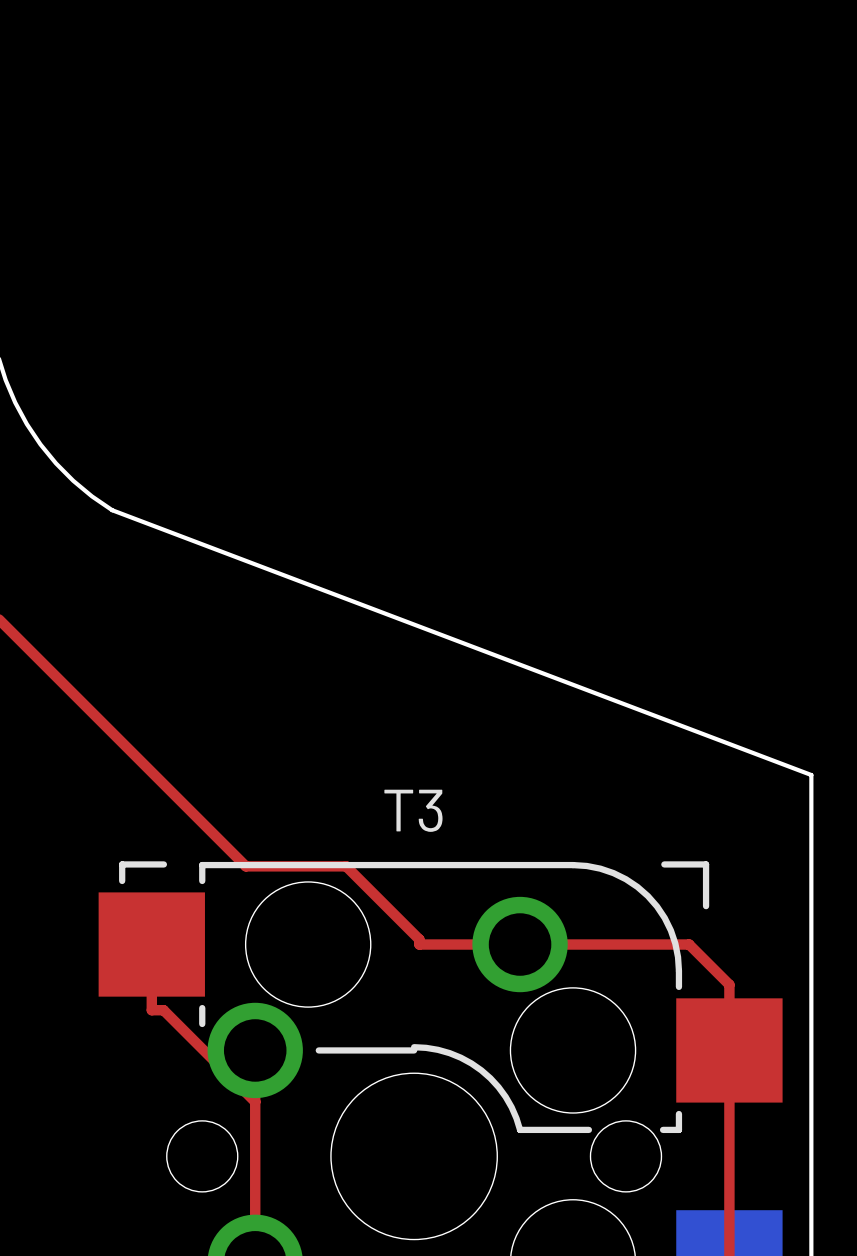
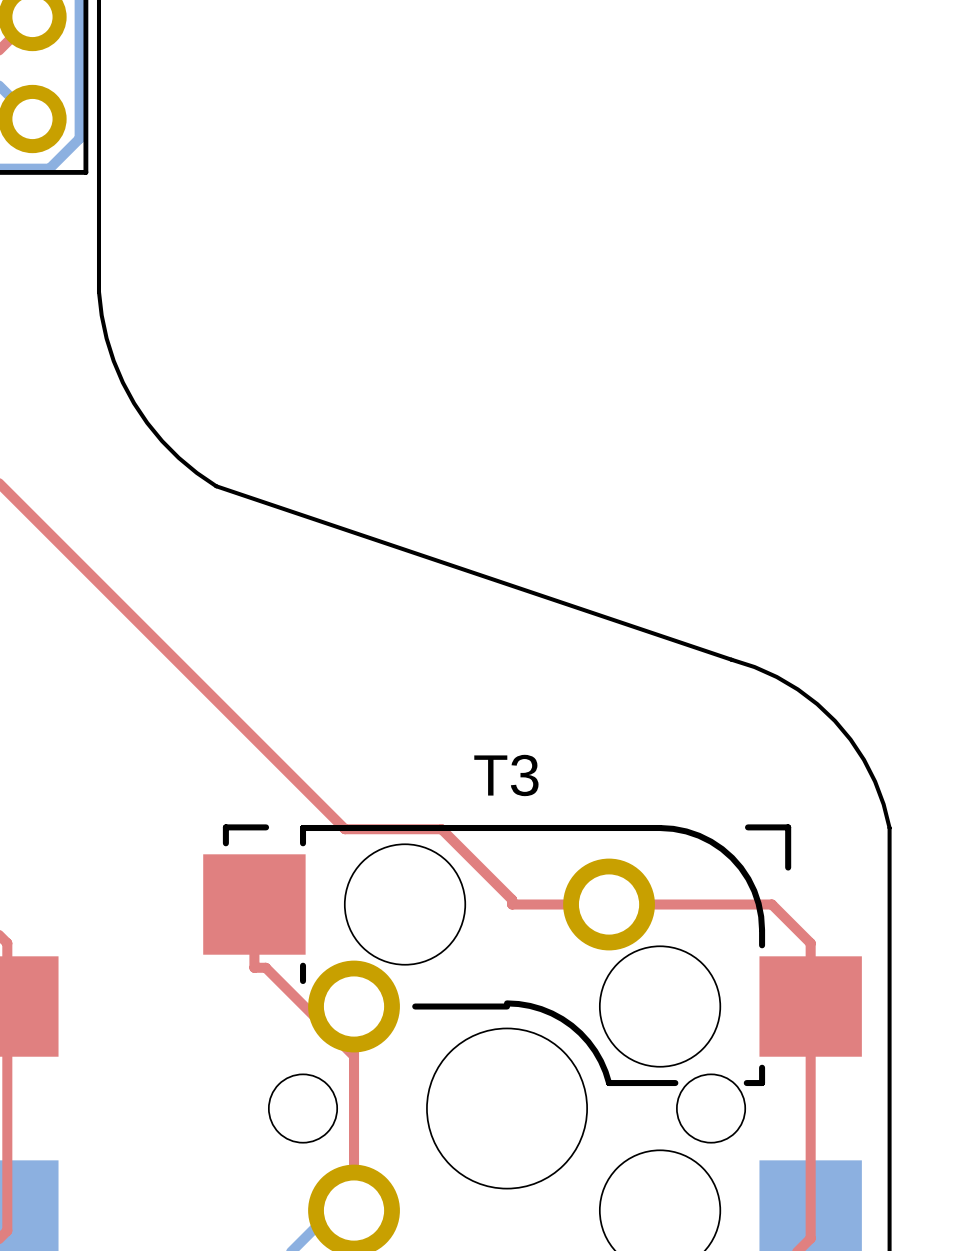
board edge: (112, 510) (811, 775) (811, 865) -> (216, 486) (754, 667) (776, 677) (817, 704) (850, 739) (875, 781) (889, 828)

